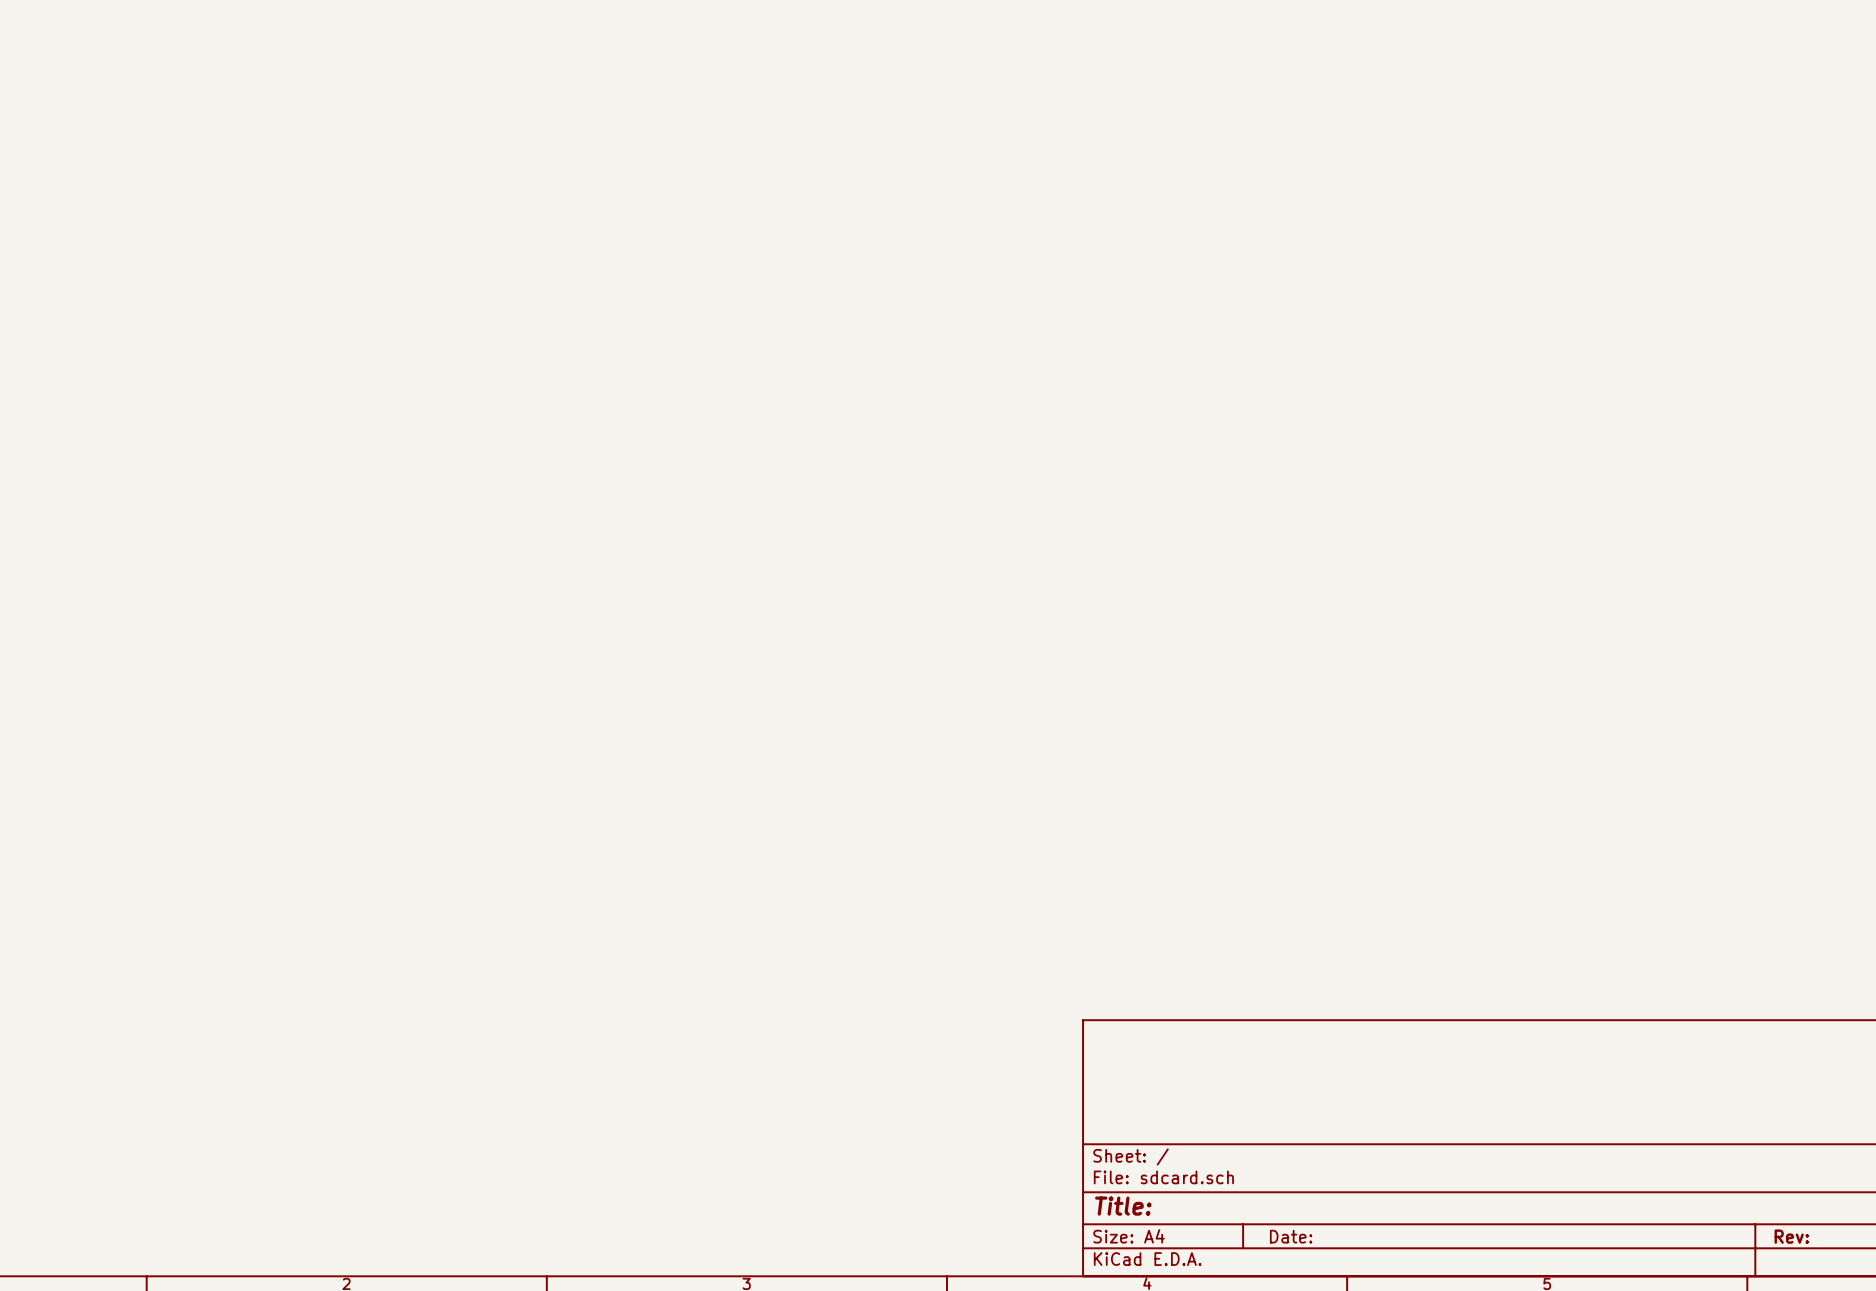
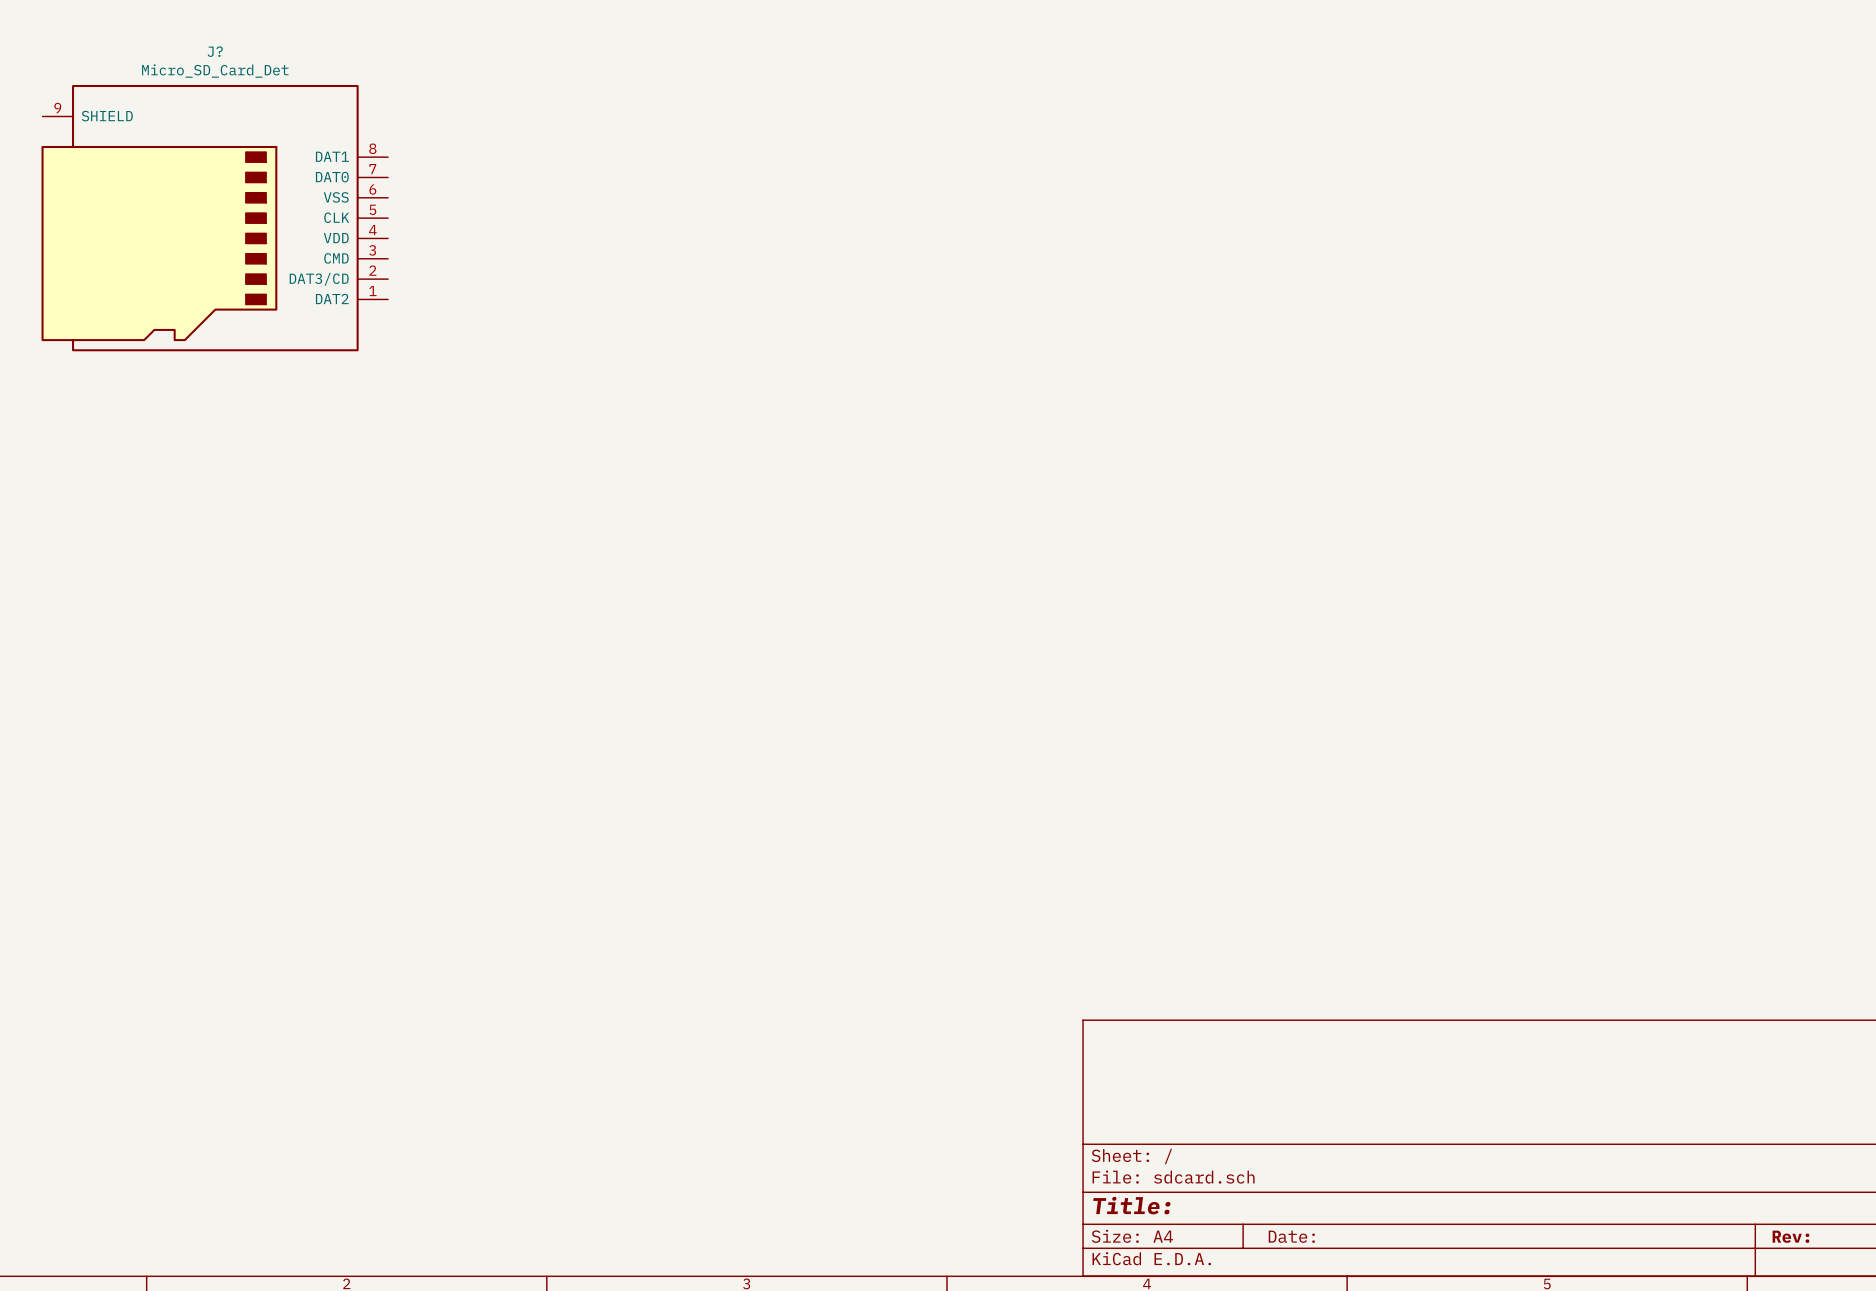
J?: none -> Micro_SD_Card_Det (214, 218)

